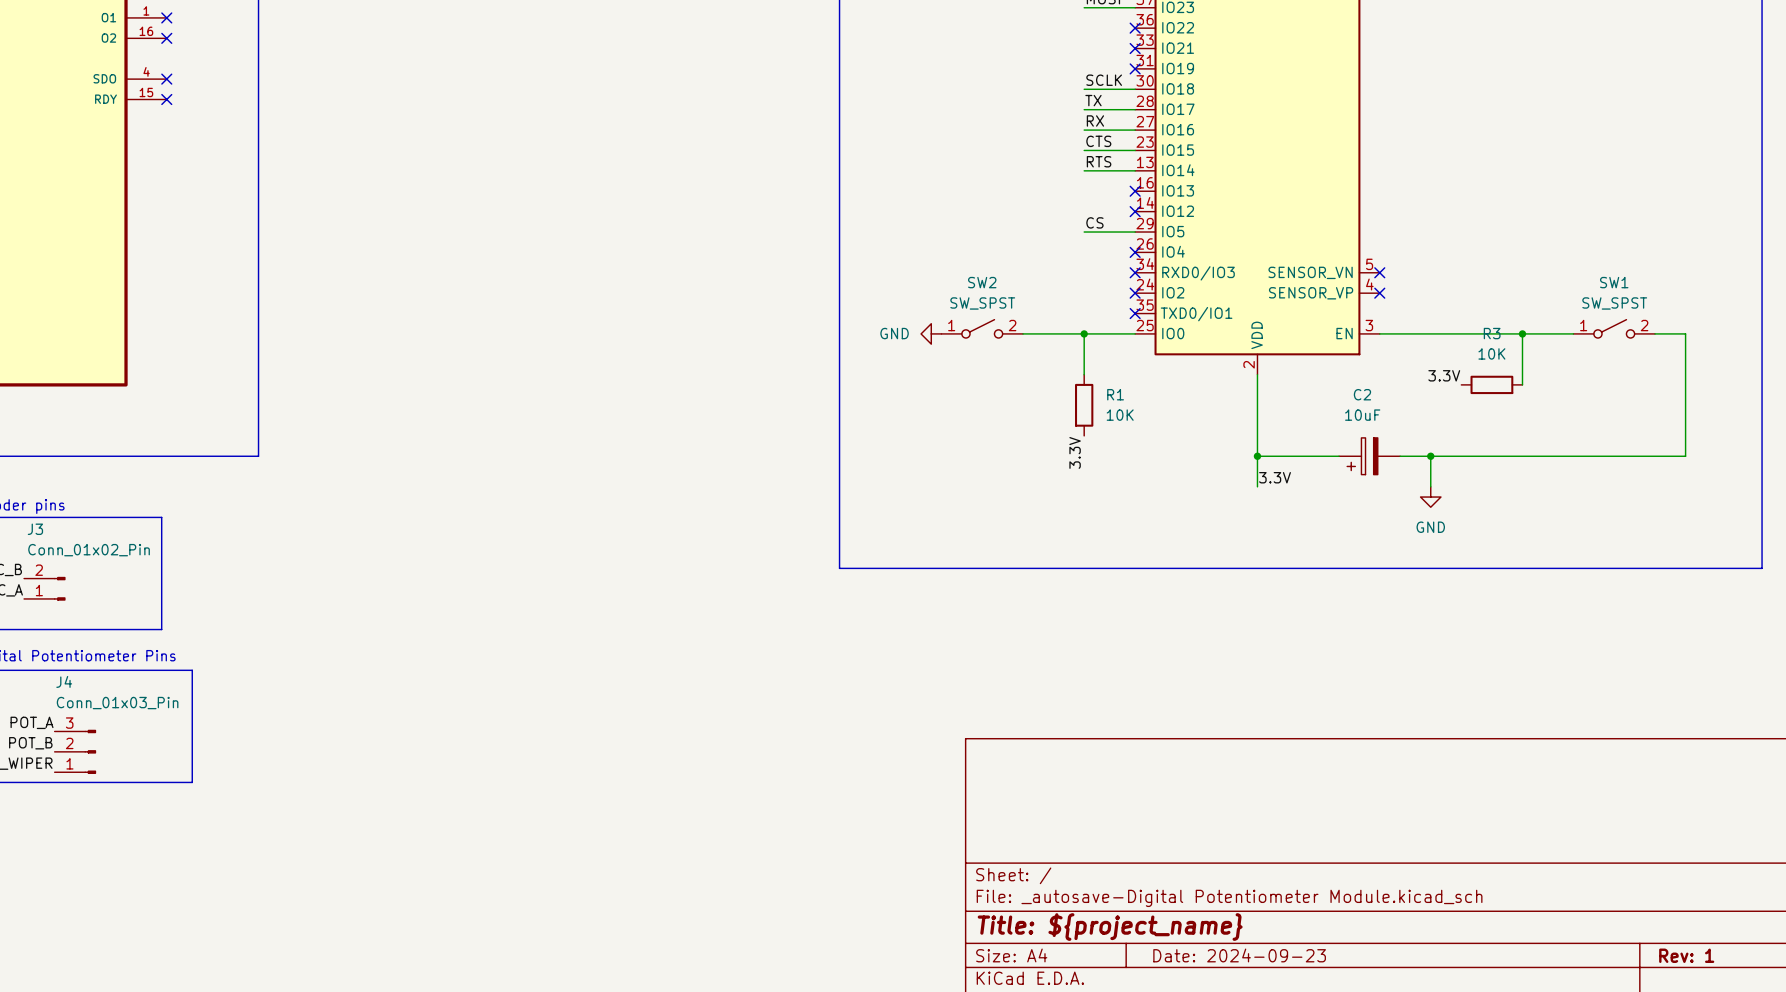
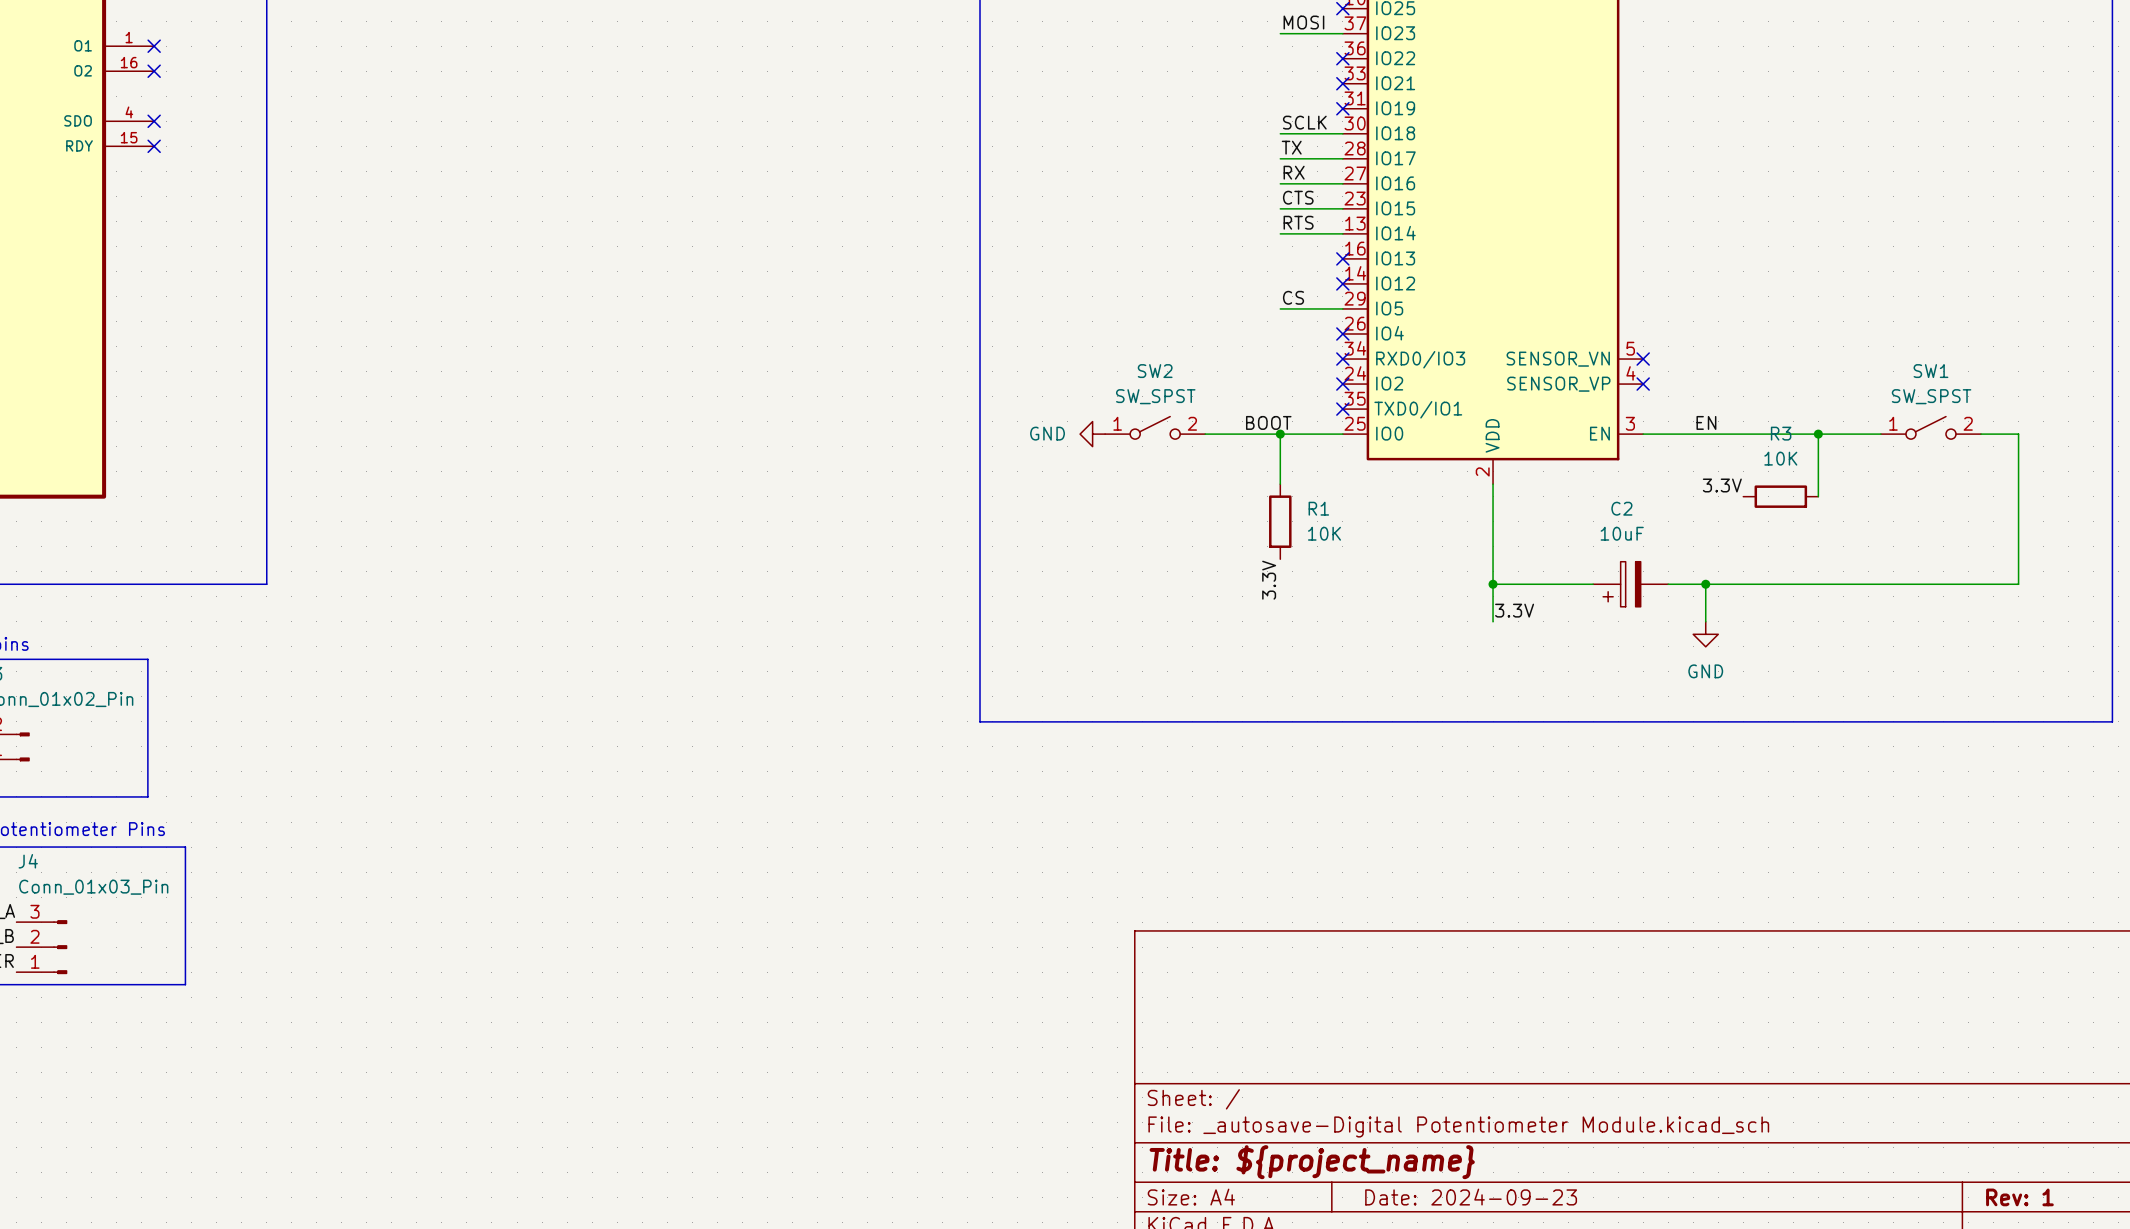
label: none -> BOOT (1268, 422)
label: none -> EN (1706, 422)

